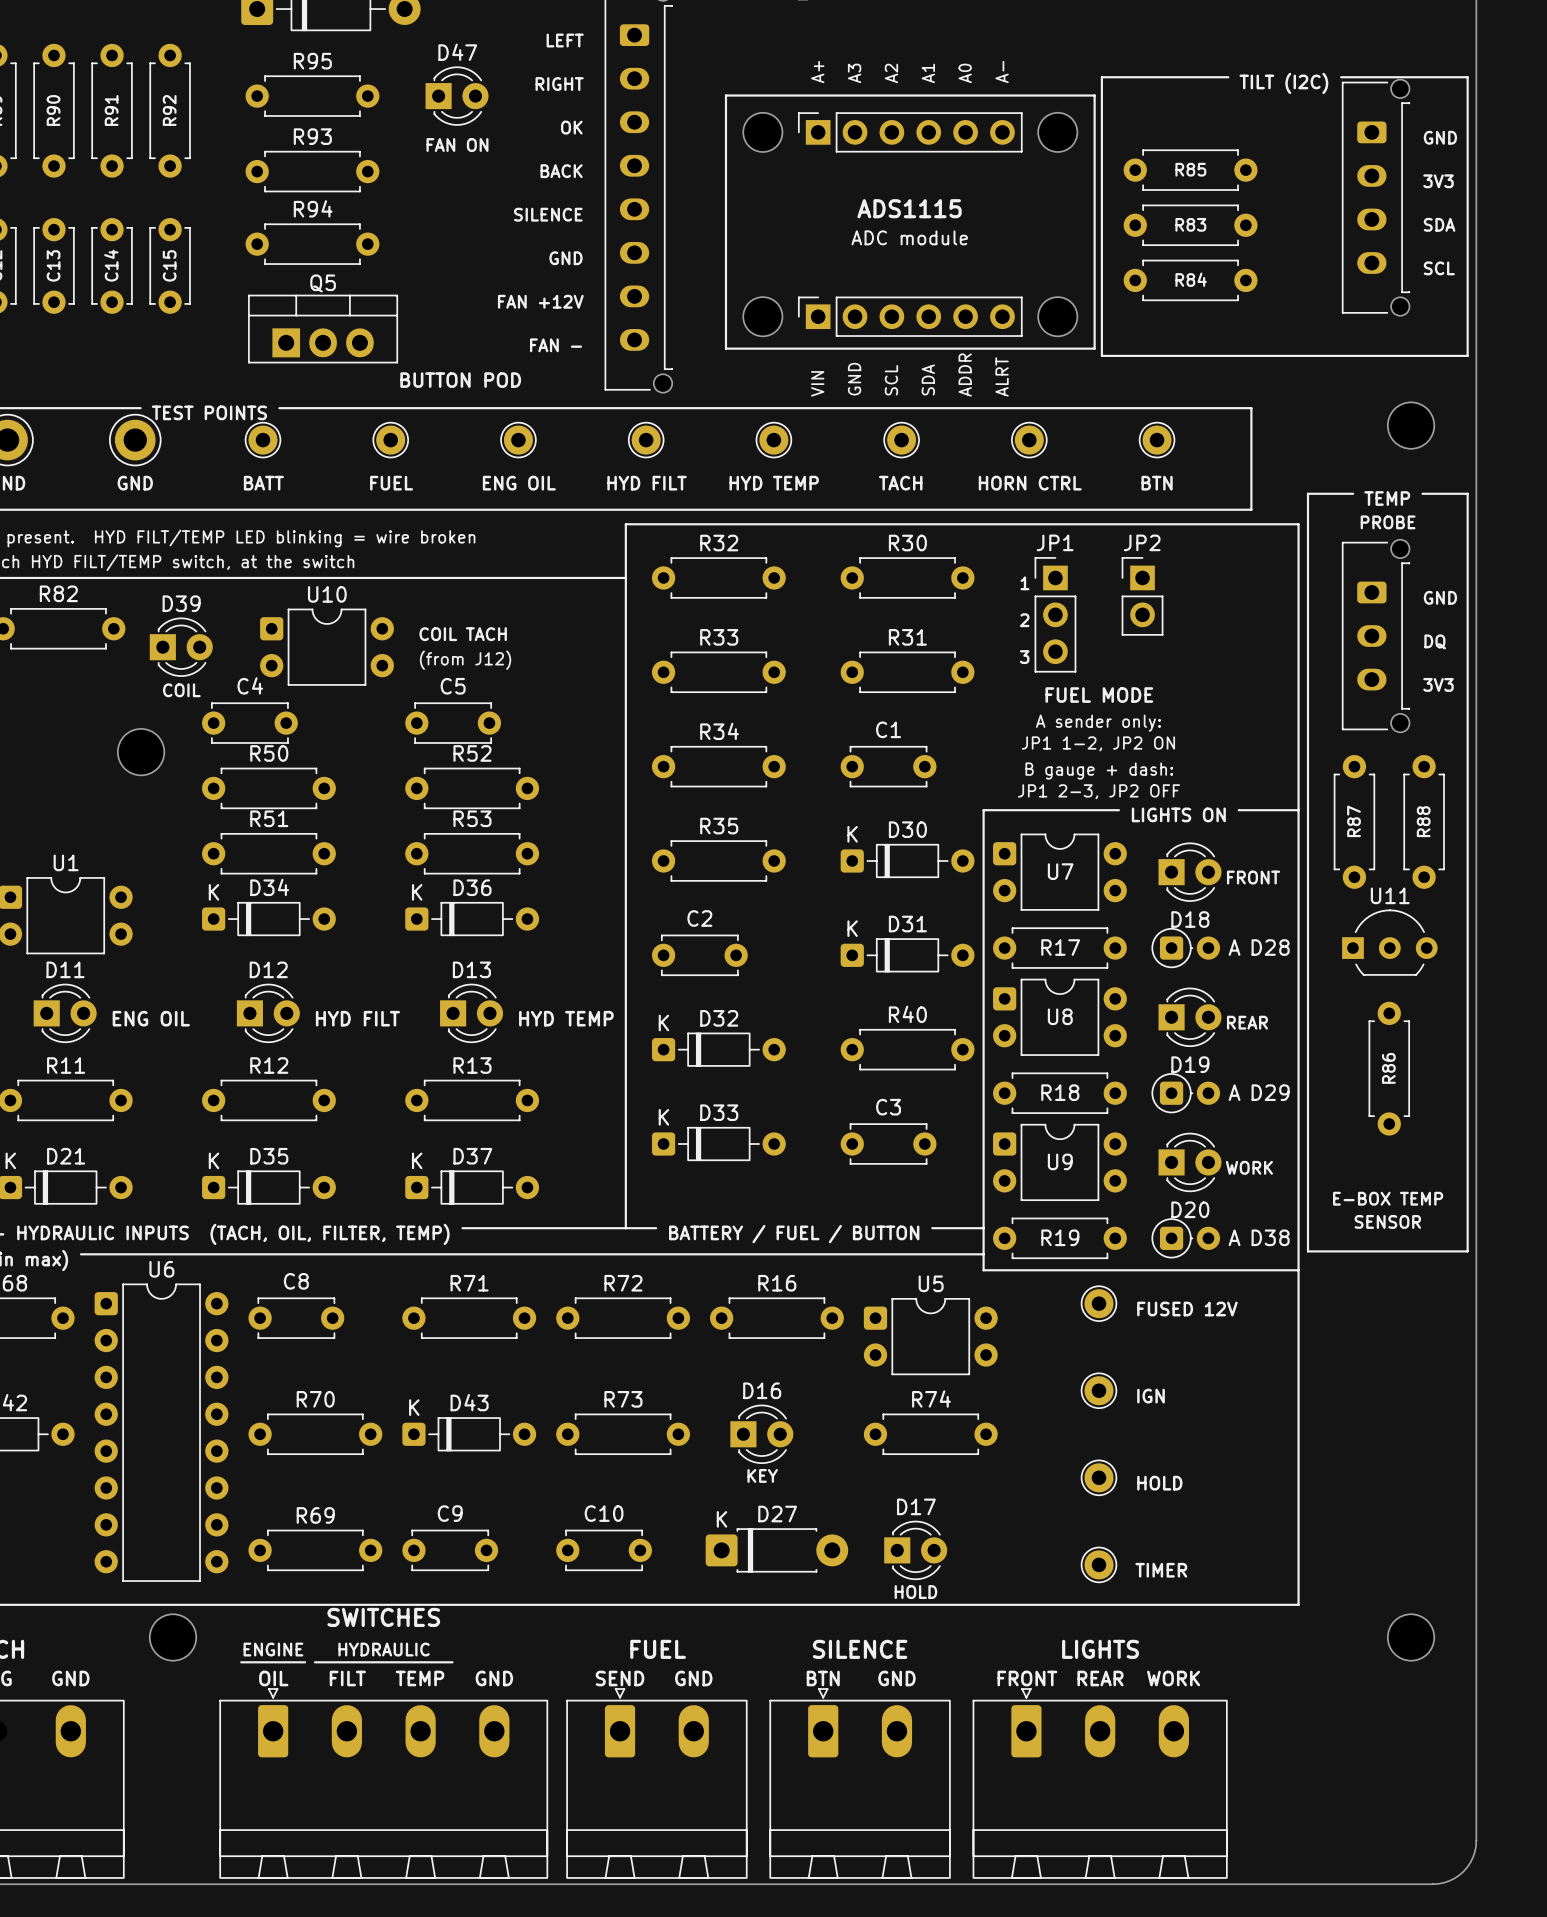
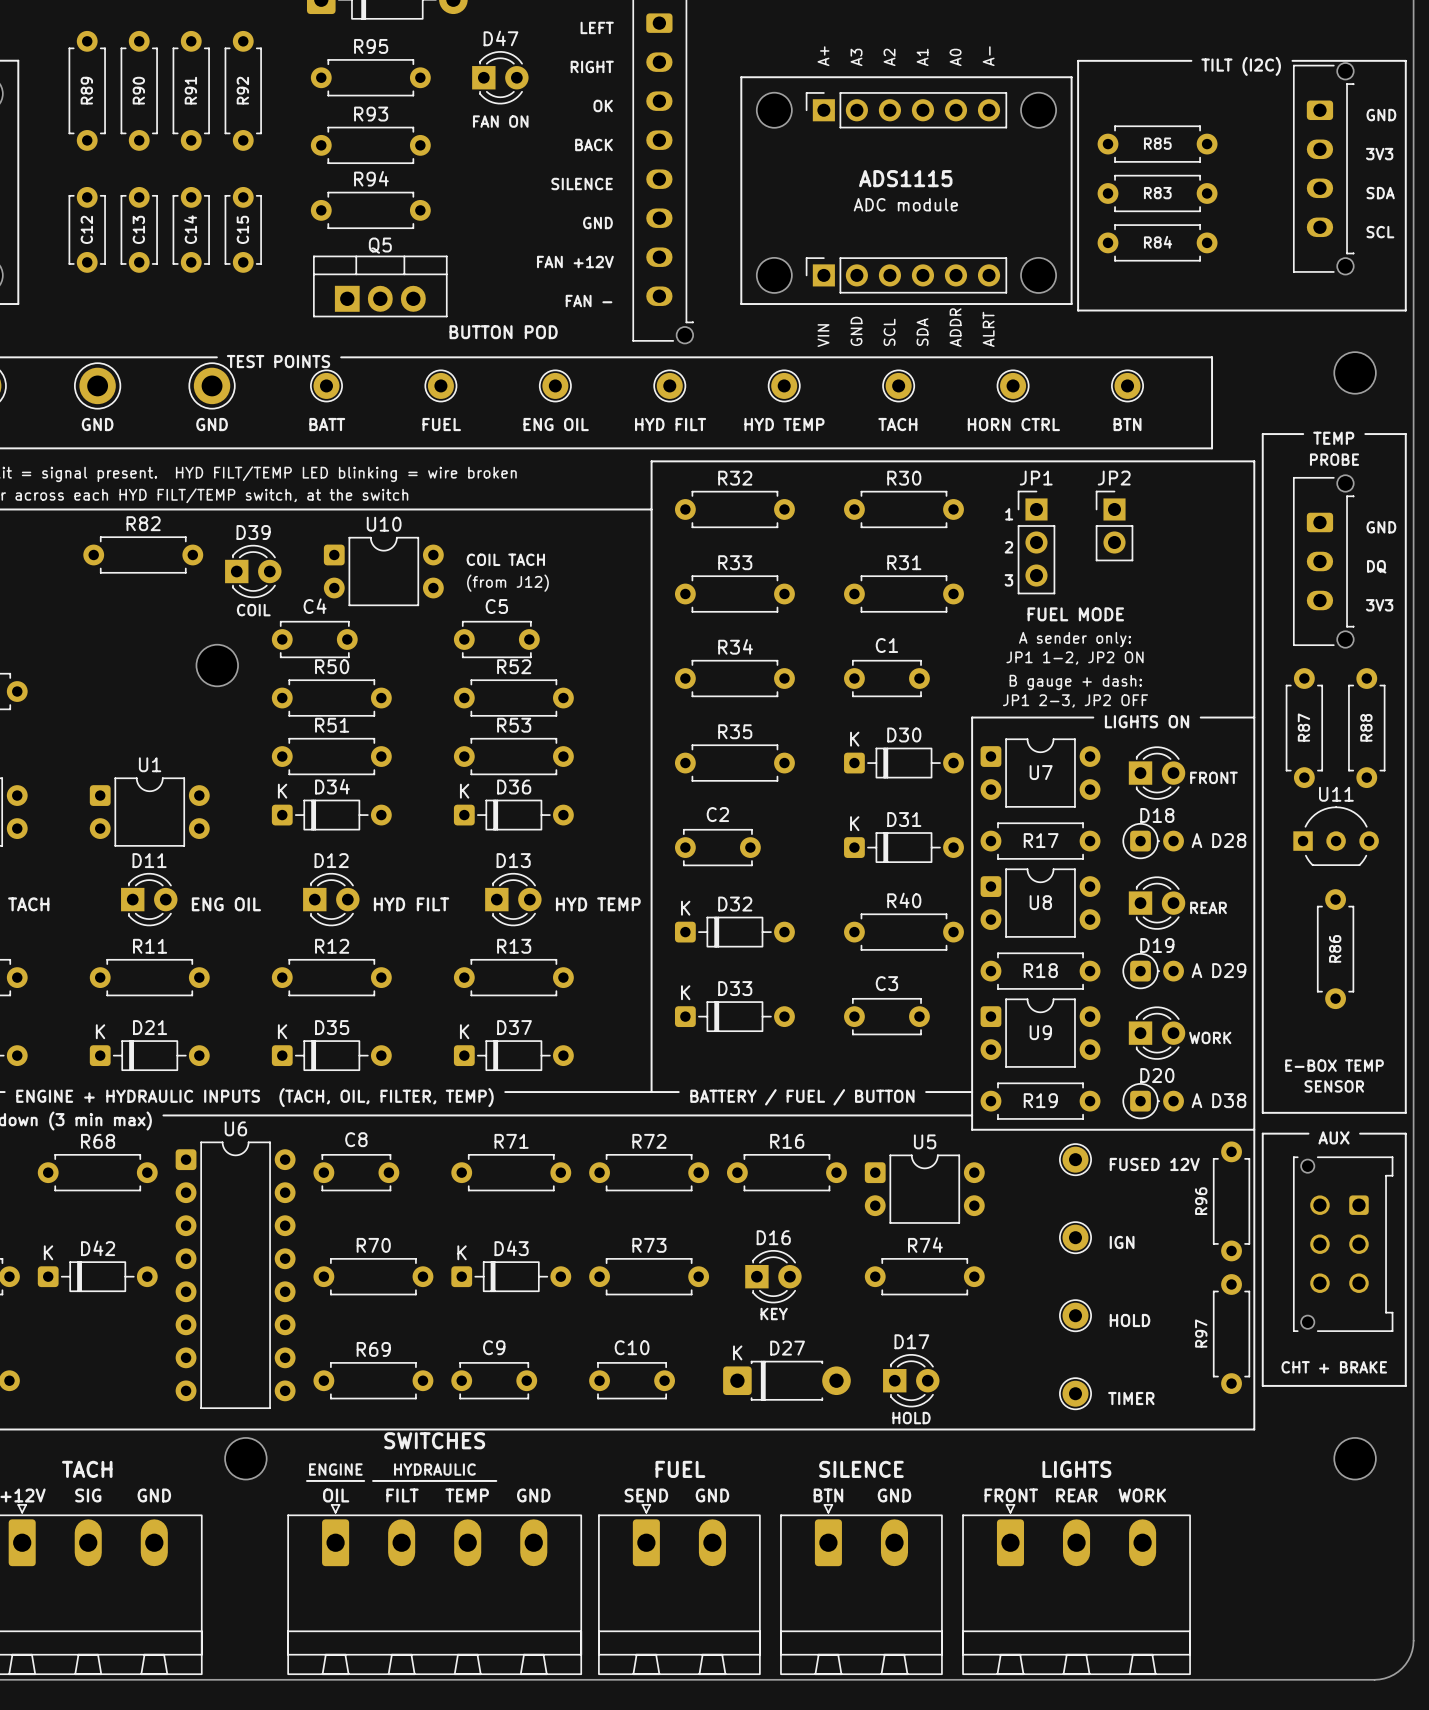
line: none -> (1308, 1133) (1262, 1133) (1262, 1385) (1405, 1385) (1405, 1133) (1360, 1133)
text: none -> AUX (1334, 1137)
R96: none -> (1231, 1201)
part: none -> (1343, 1244)
R97: none -> (1231, 1334)
text: none -> CHT + BRAKE (1334, 1367)

